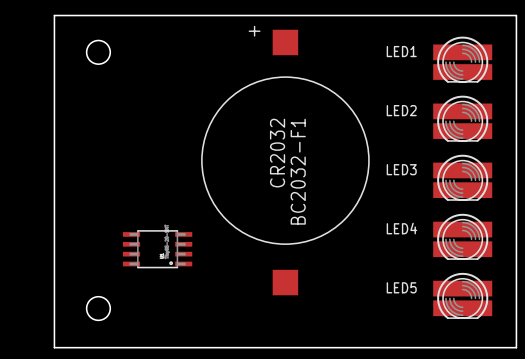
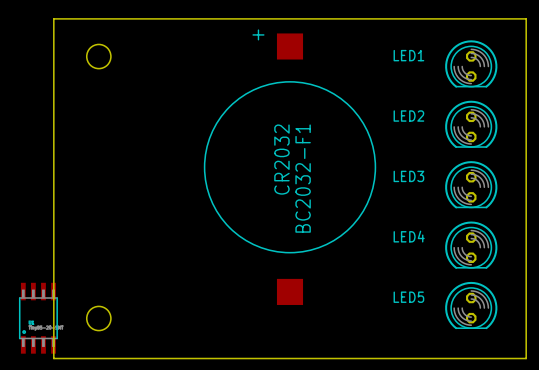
LED1 footprint: [433, 36, 493, 83] -> [445, 40, 498, 88]
LED2 footprint: [433, 95, 493, 142] -> [445, 100, 498, 149]
LED3 footprint: [433, 154, 493, 201] -> [445, 161, 498, 209]
LED4 footprint: [433, 213, 493, 261] -> [445, 221, 498, 269]
part rotation: 0° (157, 249) -> 90° clockwise (38, 318)
part position: (157, 249) -> (38, 318)
LED5 footprint: [433, 272, 493, 320] -> [445, 281, 498, 330]

